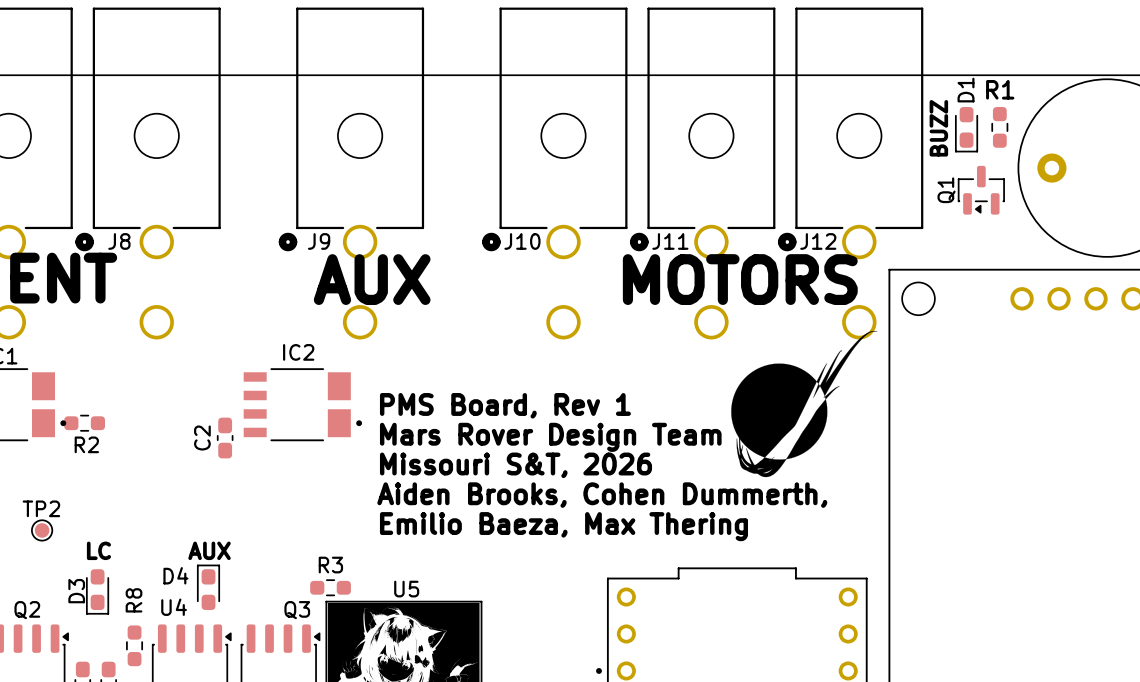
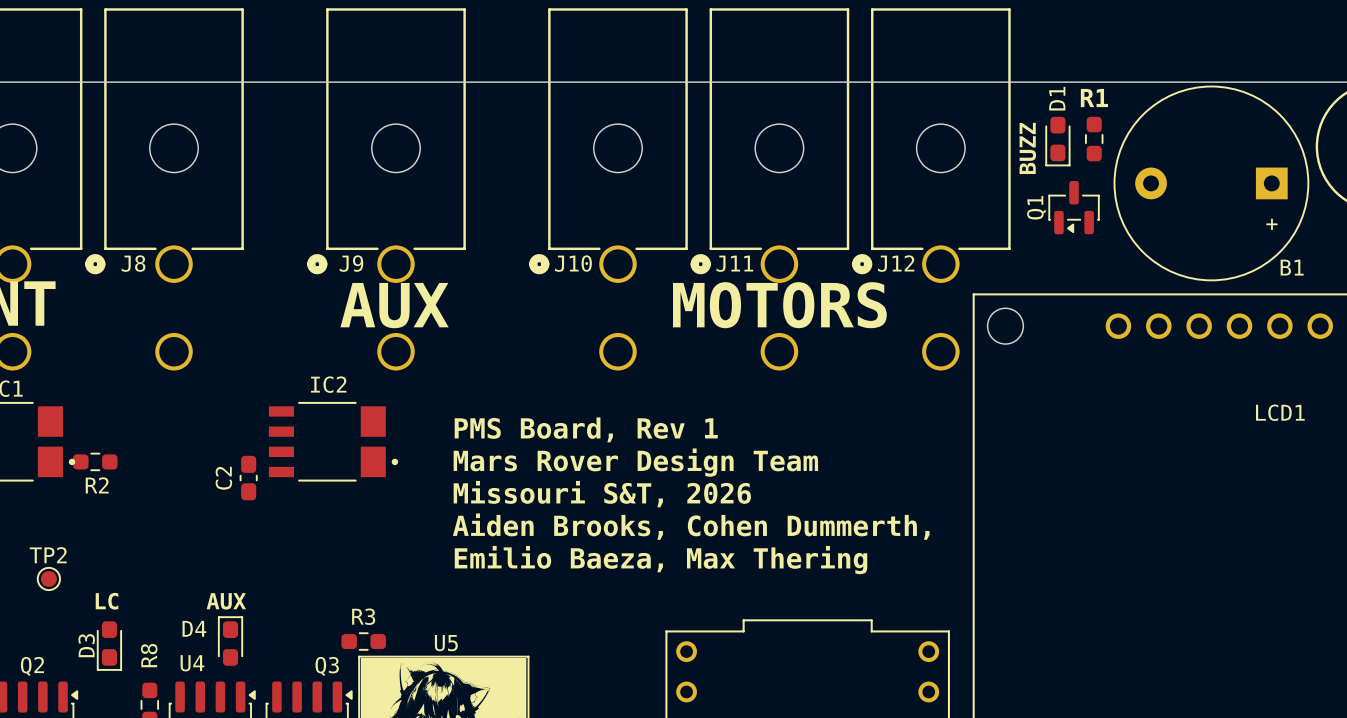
drawing: [731, 330, 878, 478] -> none
text position: PMS Board, Rev 1 (505, 405) -> PMS Board, Rev 1 (586, 429)
text position: Mars Rover Design Team (550, 437) -> Mars Rover Design Team (635, 462)
text position: Missouri S&T, 2026 (515, 465) -> Missouri S&T, 2026 (602, 494)
text position: Aiden Brooks, Cohen Dummerth, (602, 495) -> Aiden Brooks, Cohen Dummerth, (691, 526)
text position: Emilio Baeza, Max Thering (563, 526) -> Emilio Baeza, Max Thering (661, 560)

